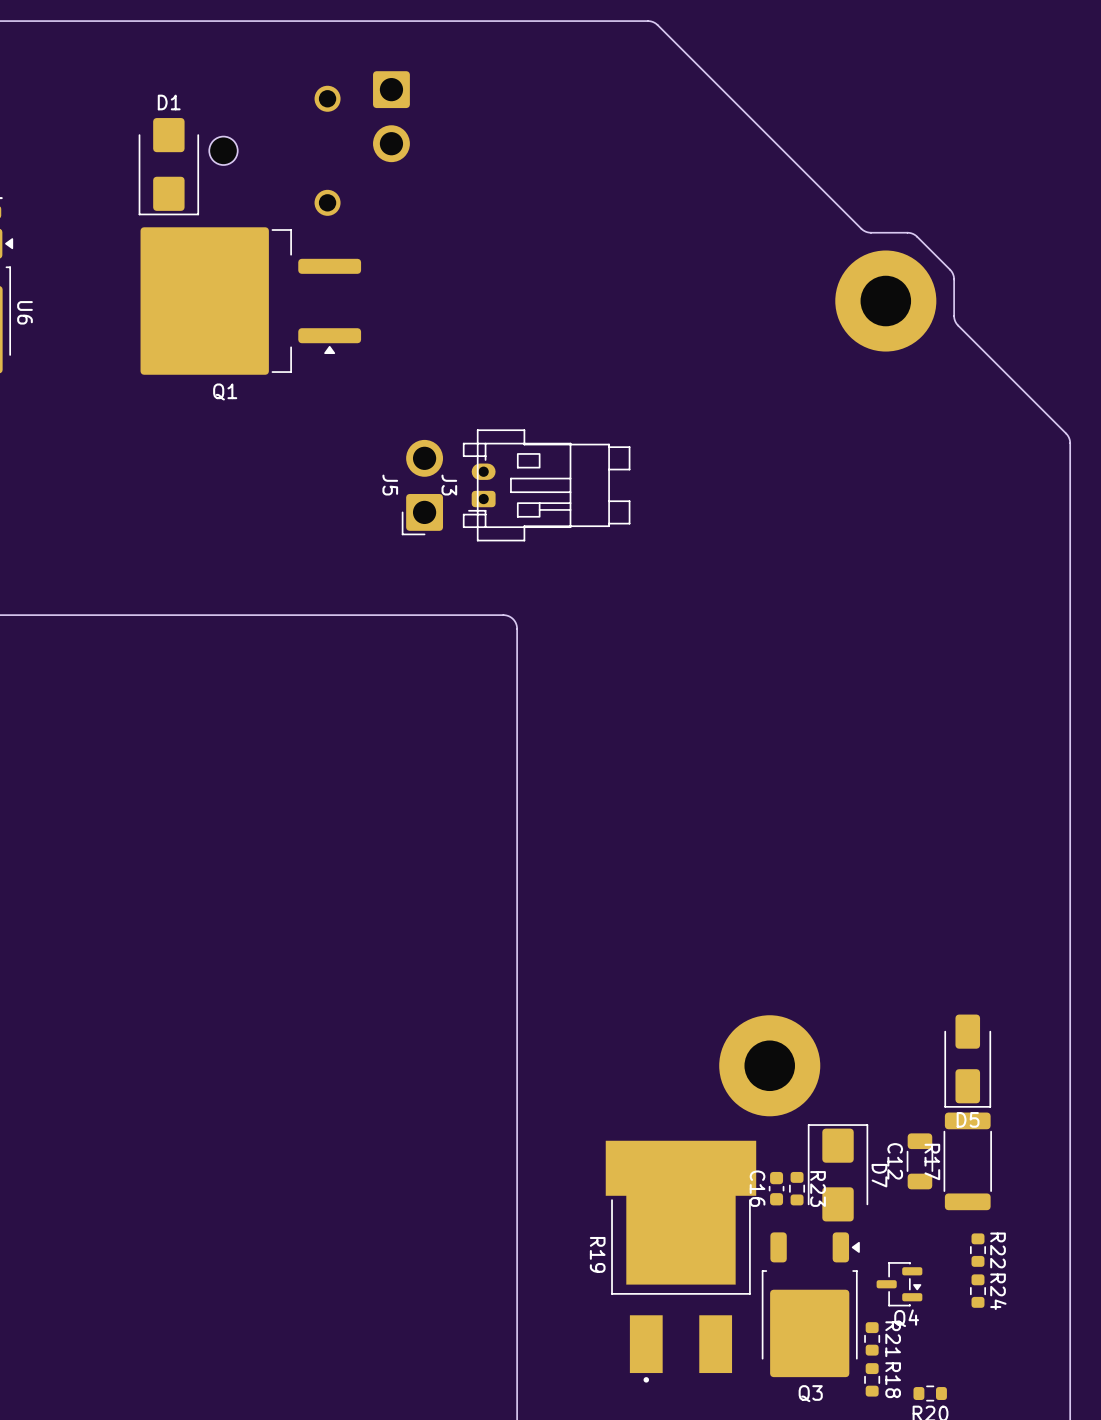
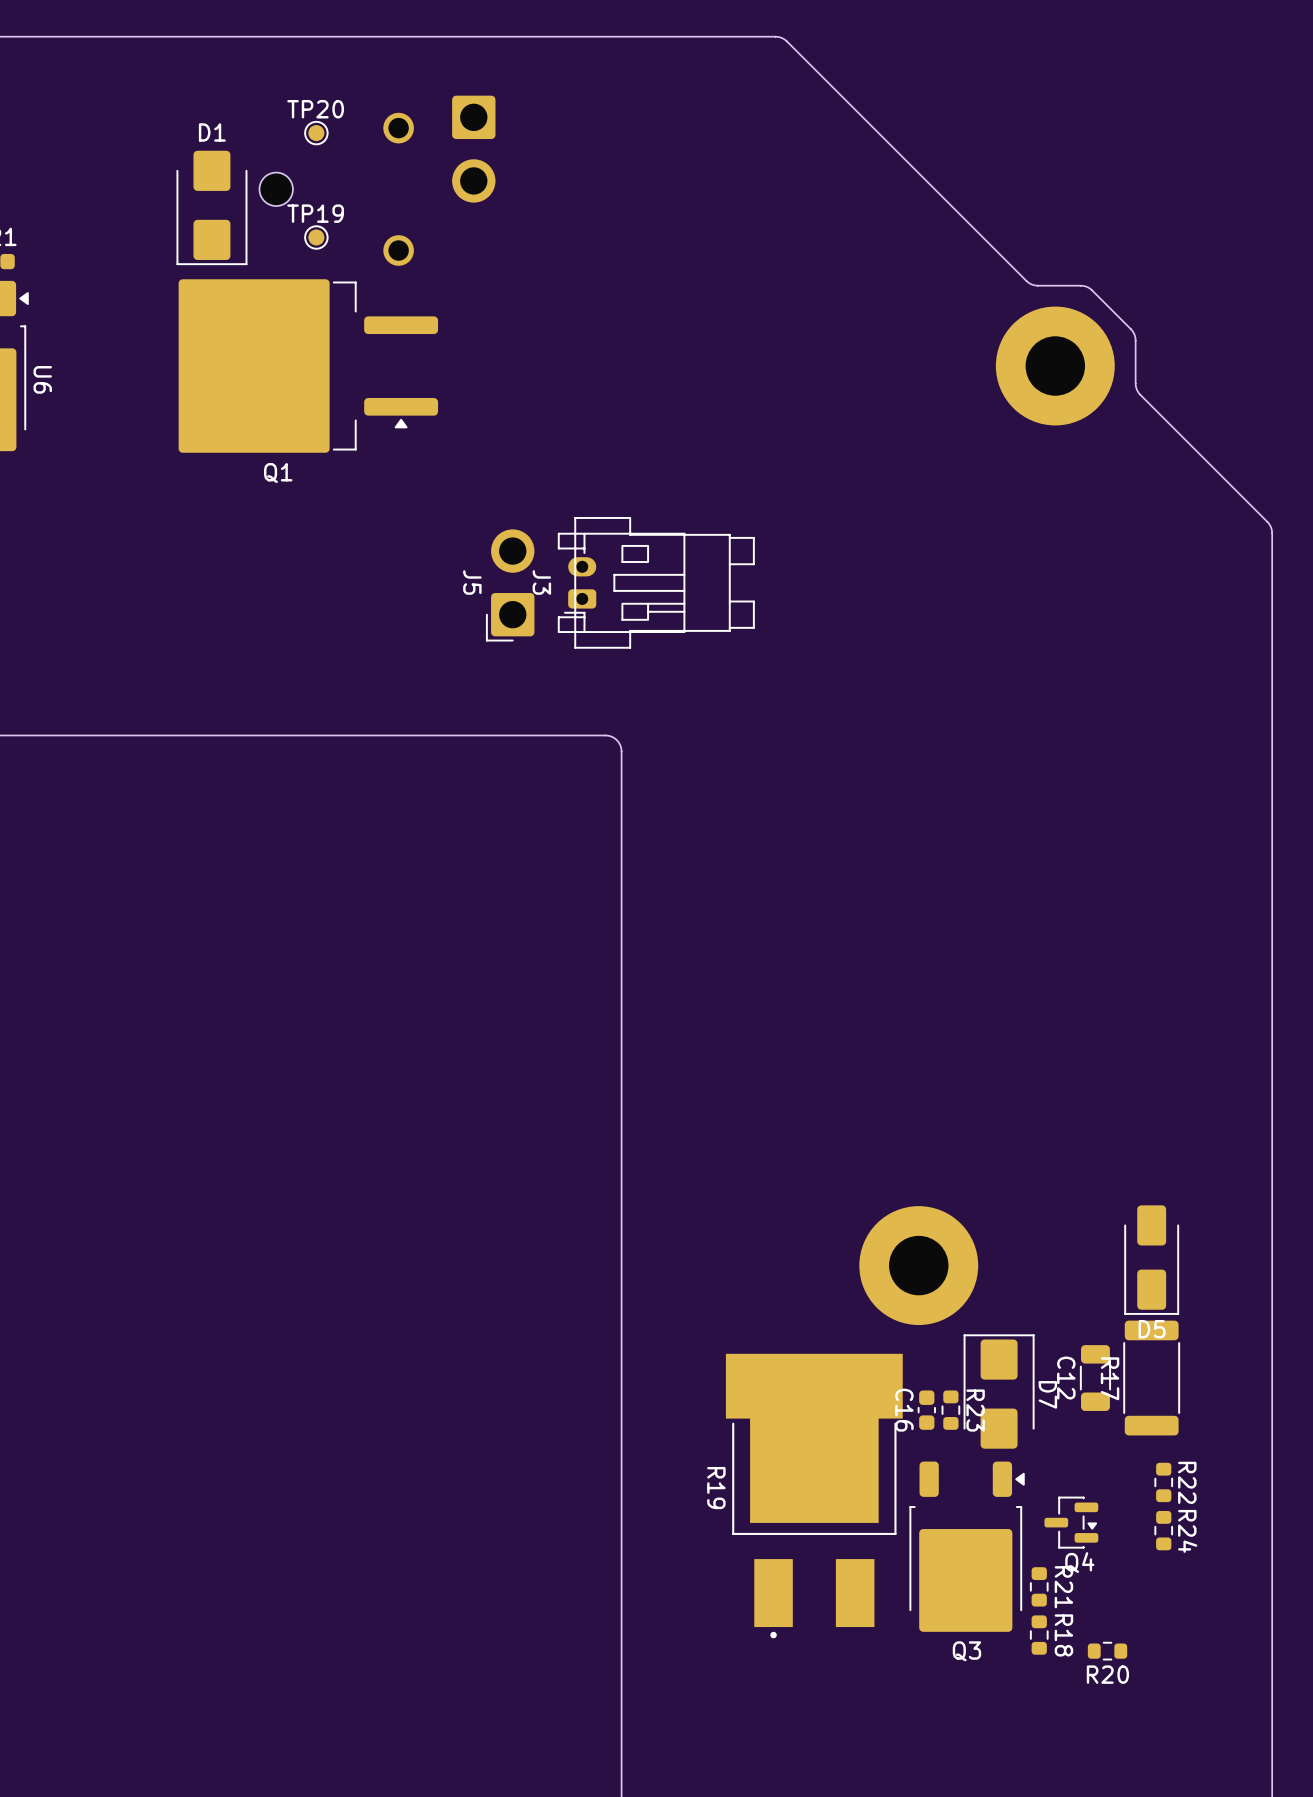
TP20: none -> (316, 133)
TP19: none -> (316, 237)

